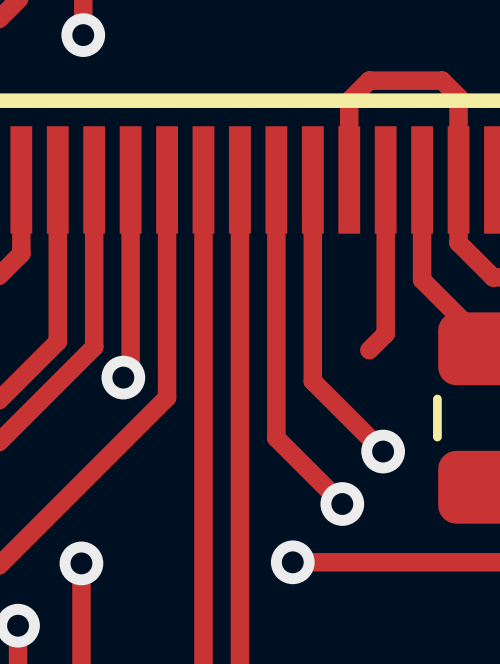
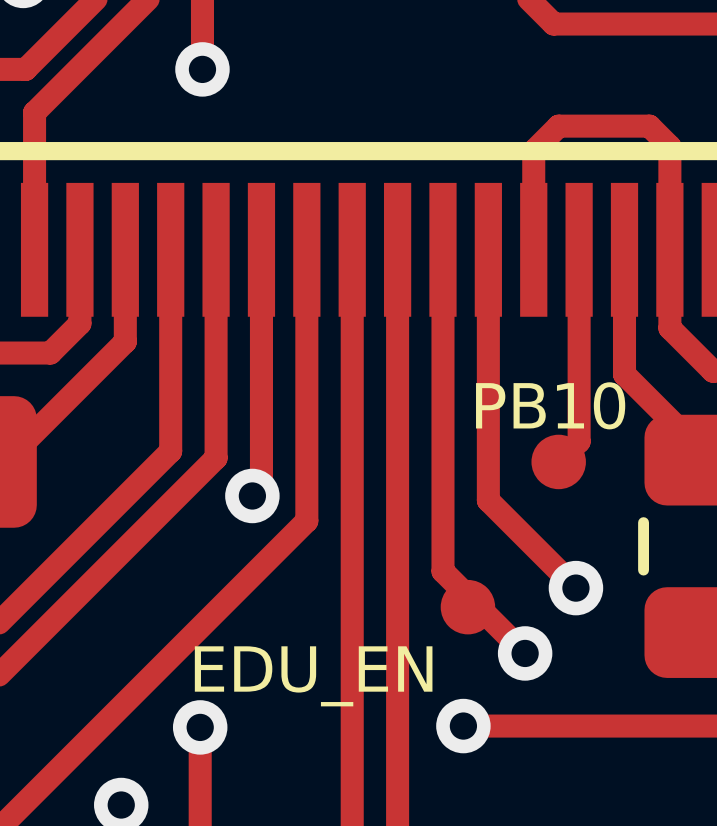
PB10: none -> (558, 461)
EDU_EN: none -> (467, 607)

